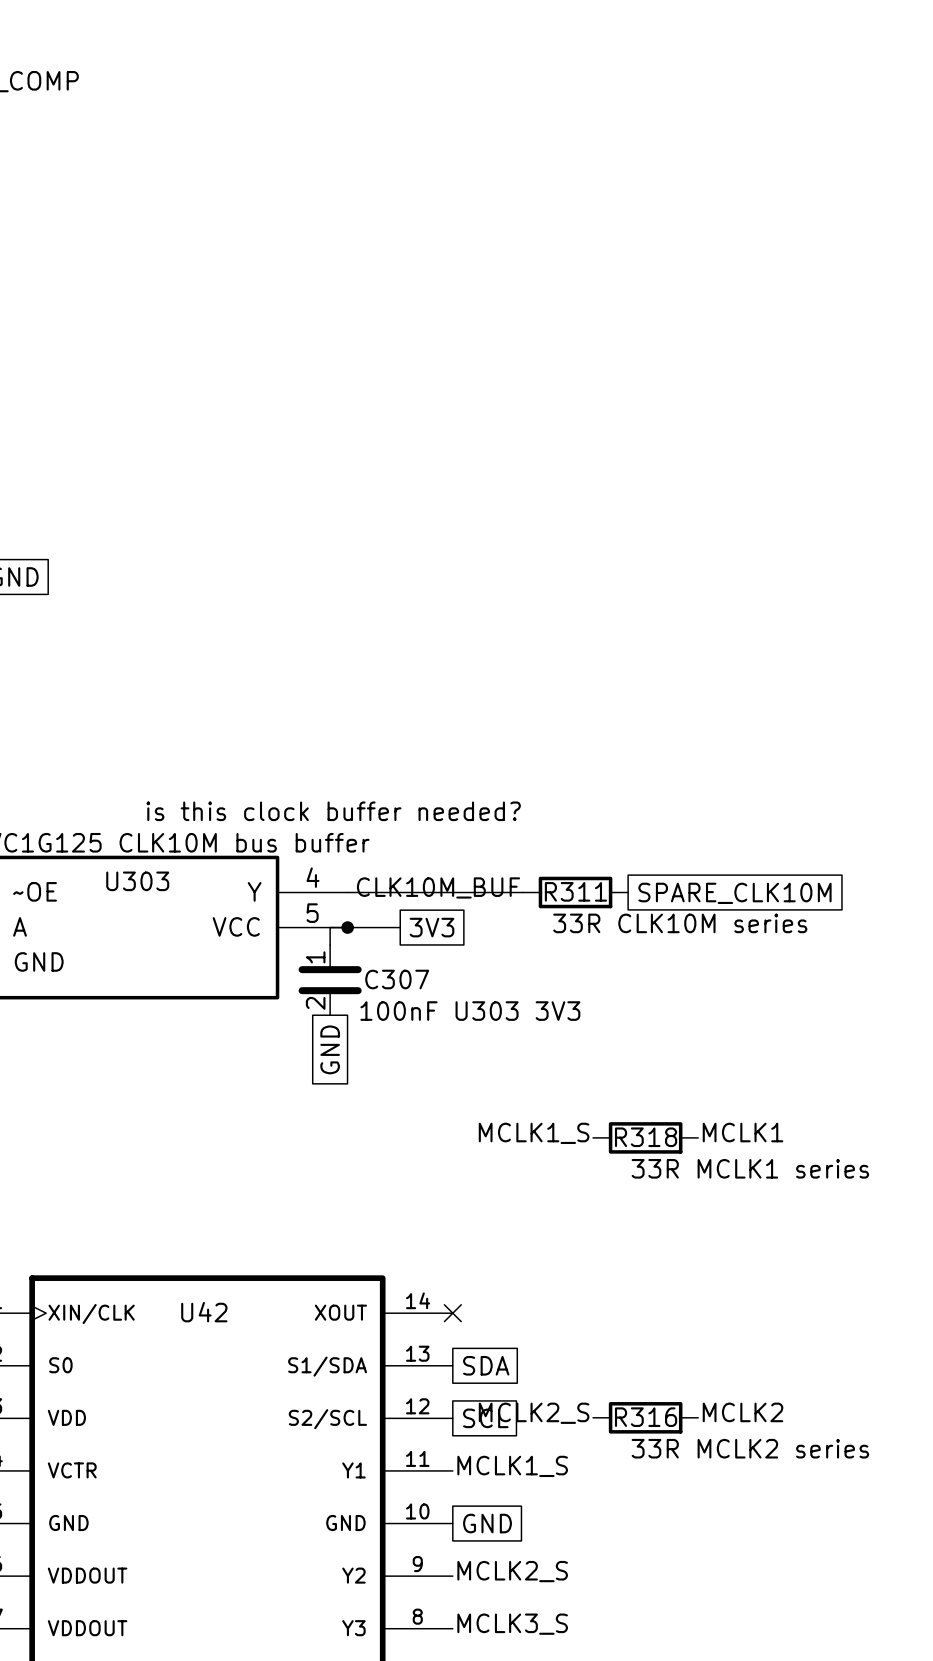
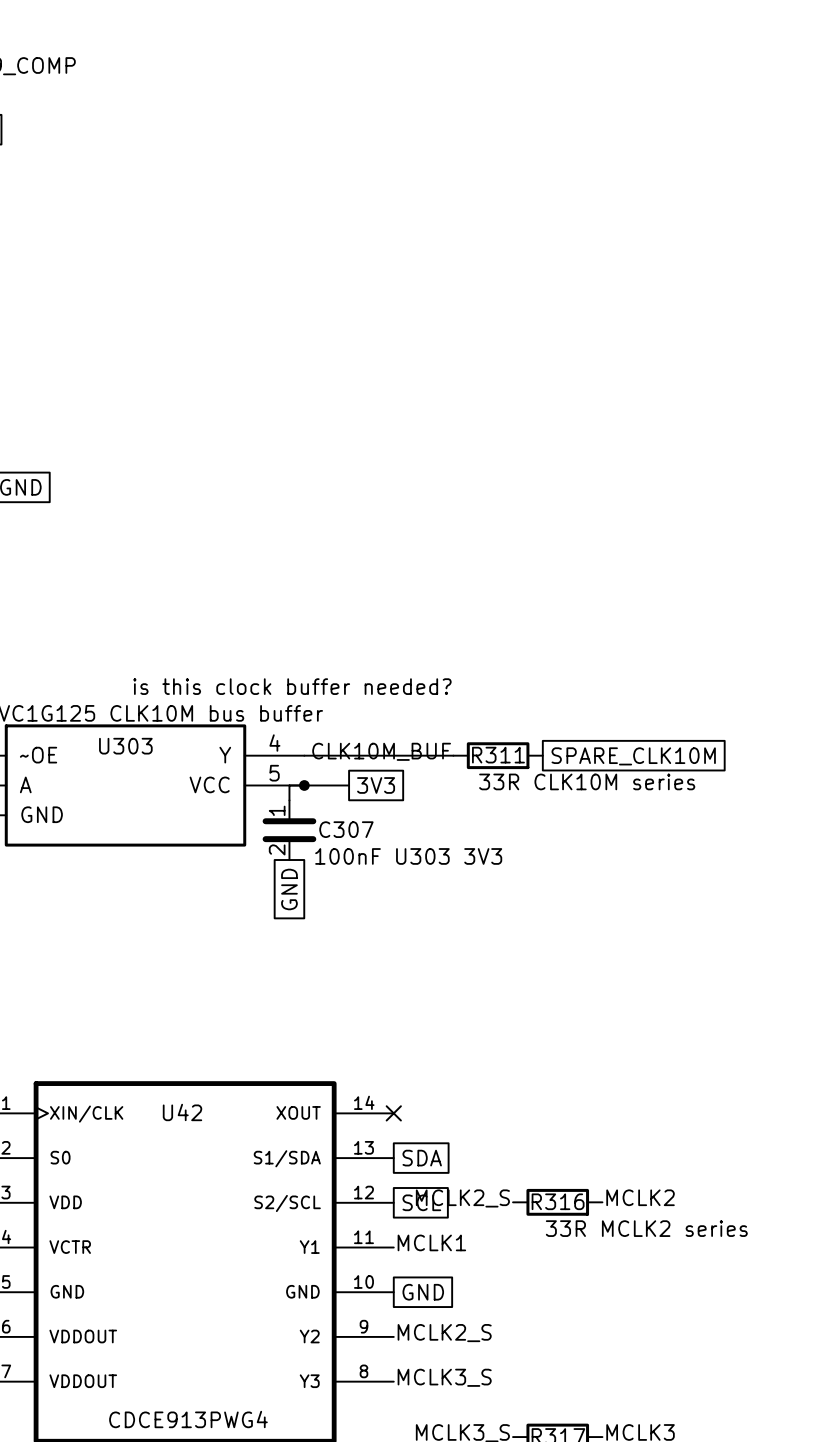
label: MCLK1 (743, 1132) -> none
label: MCLK1_S (534, 1133) -> none
R318: 33R MCLK1 series (645, 1137) -> none
label: MCLK1_S (512, 1466) -> MCLK1 (431, 1242)

